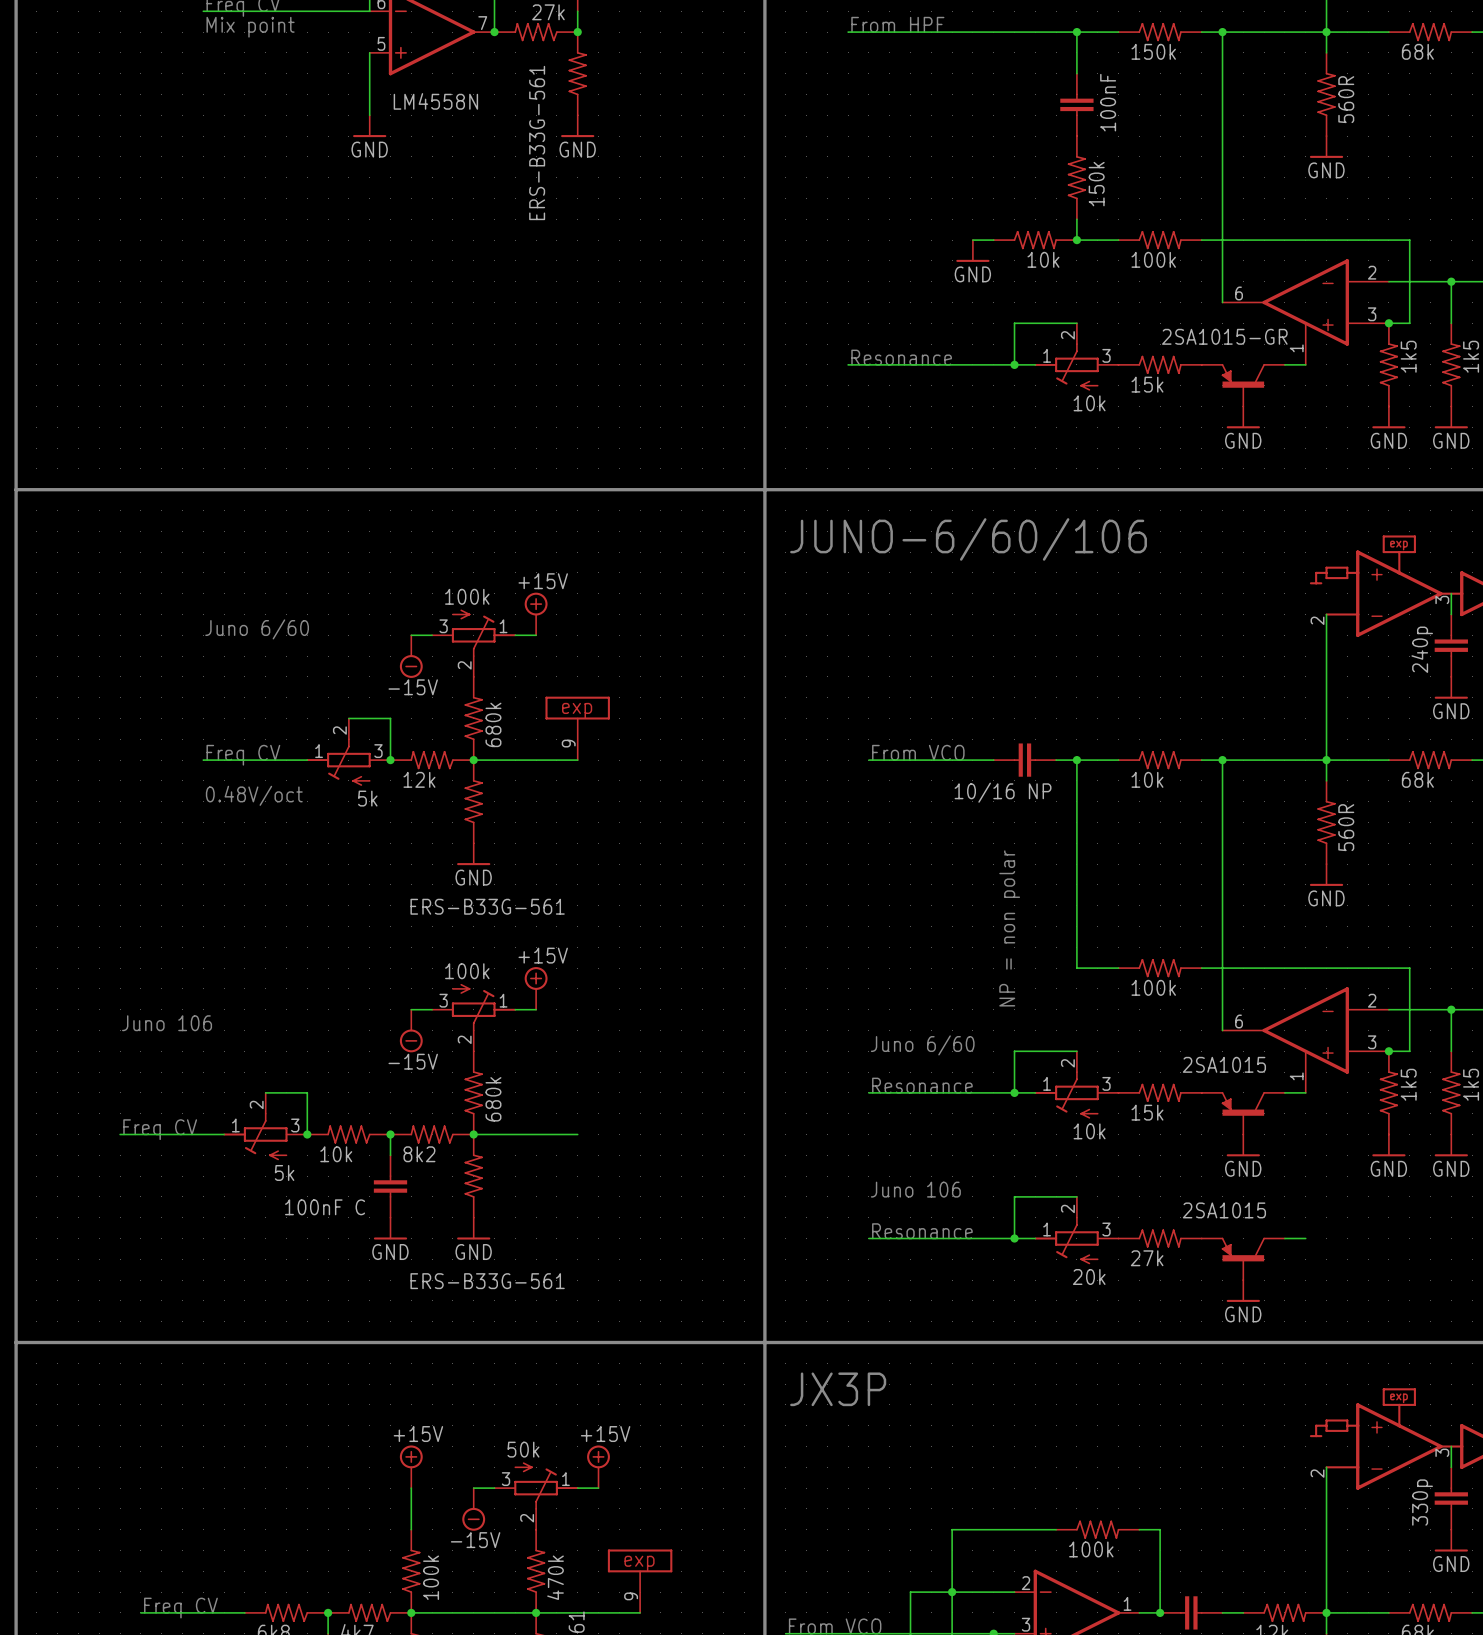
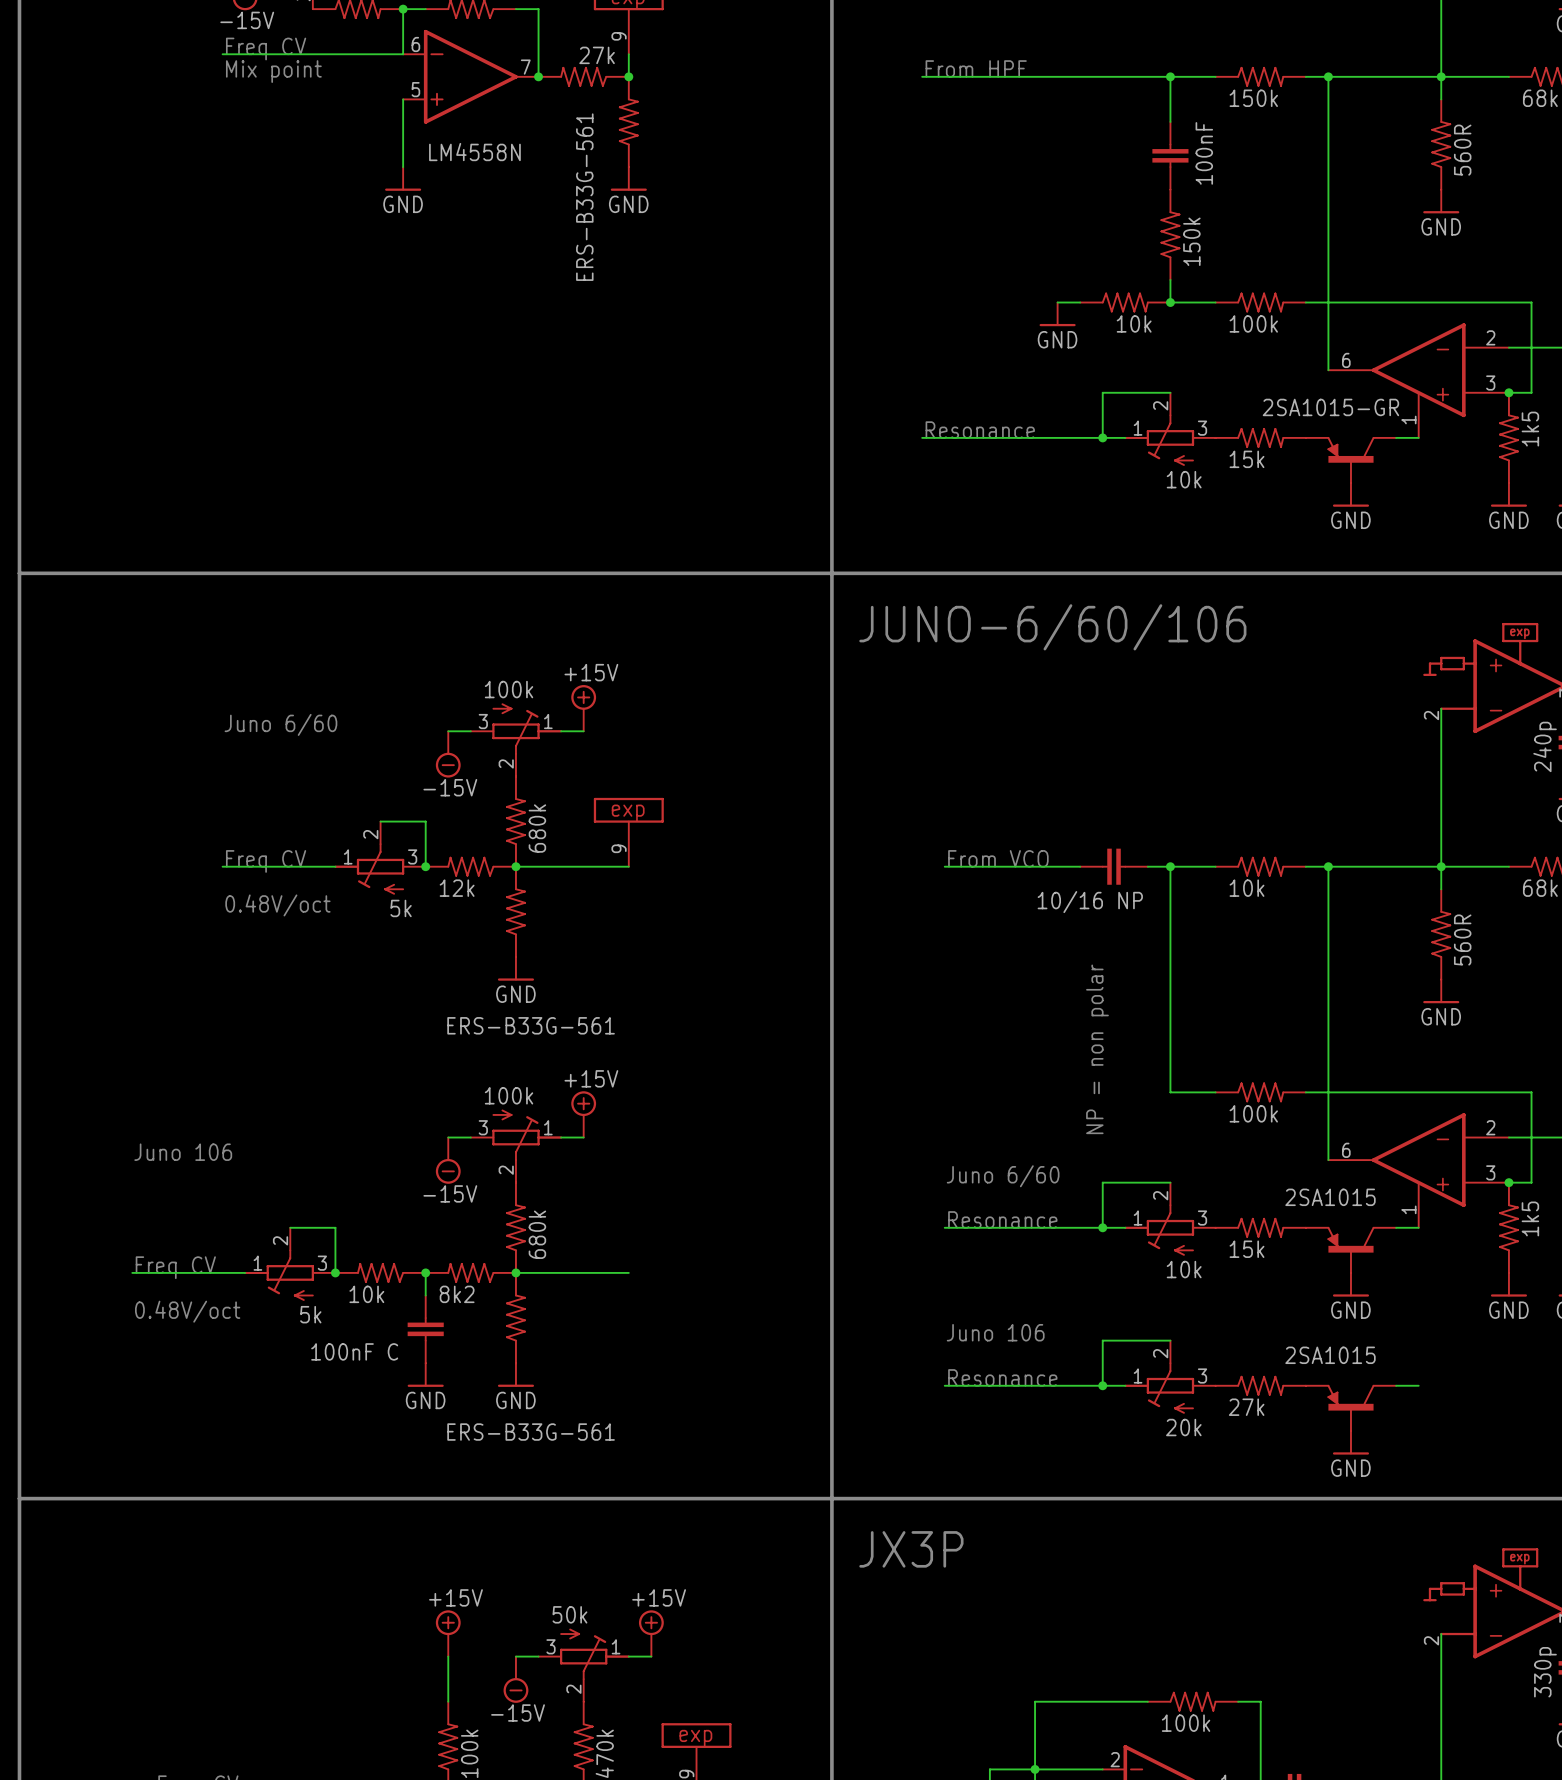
text: none -> 0.48V/oct (187, 1311)

